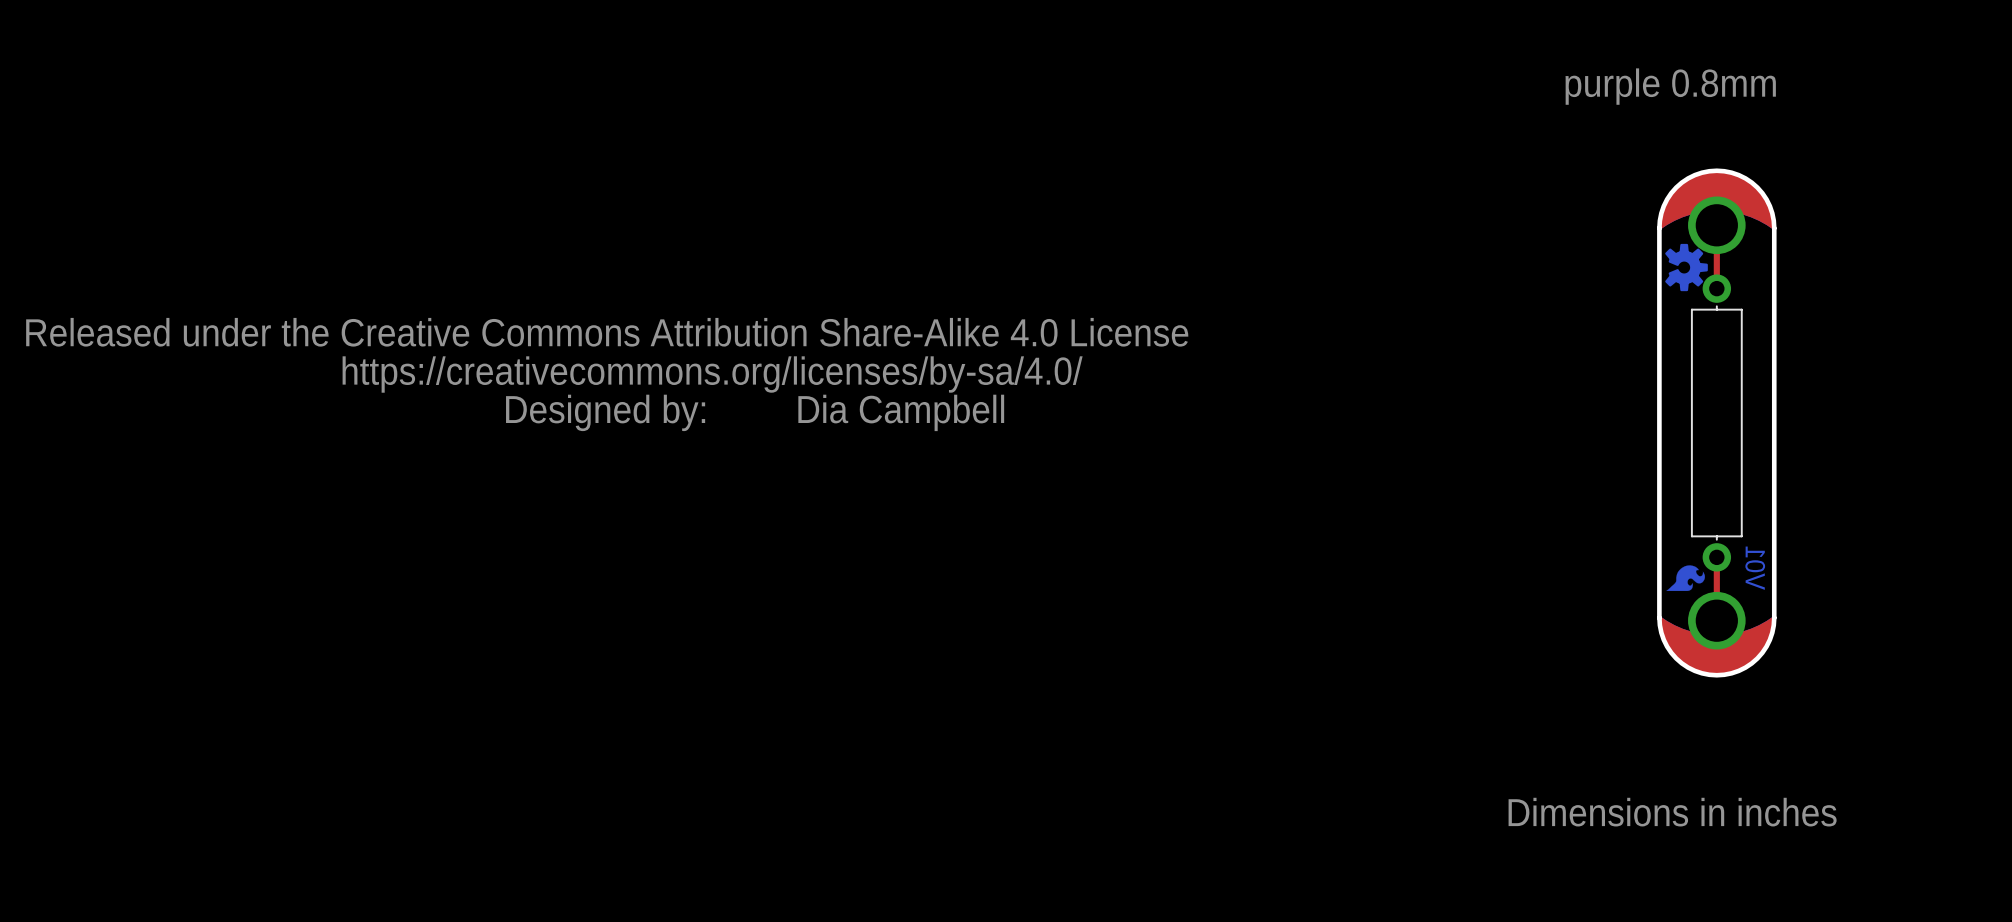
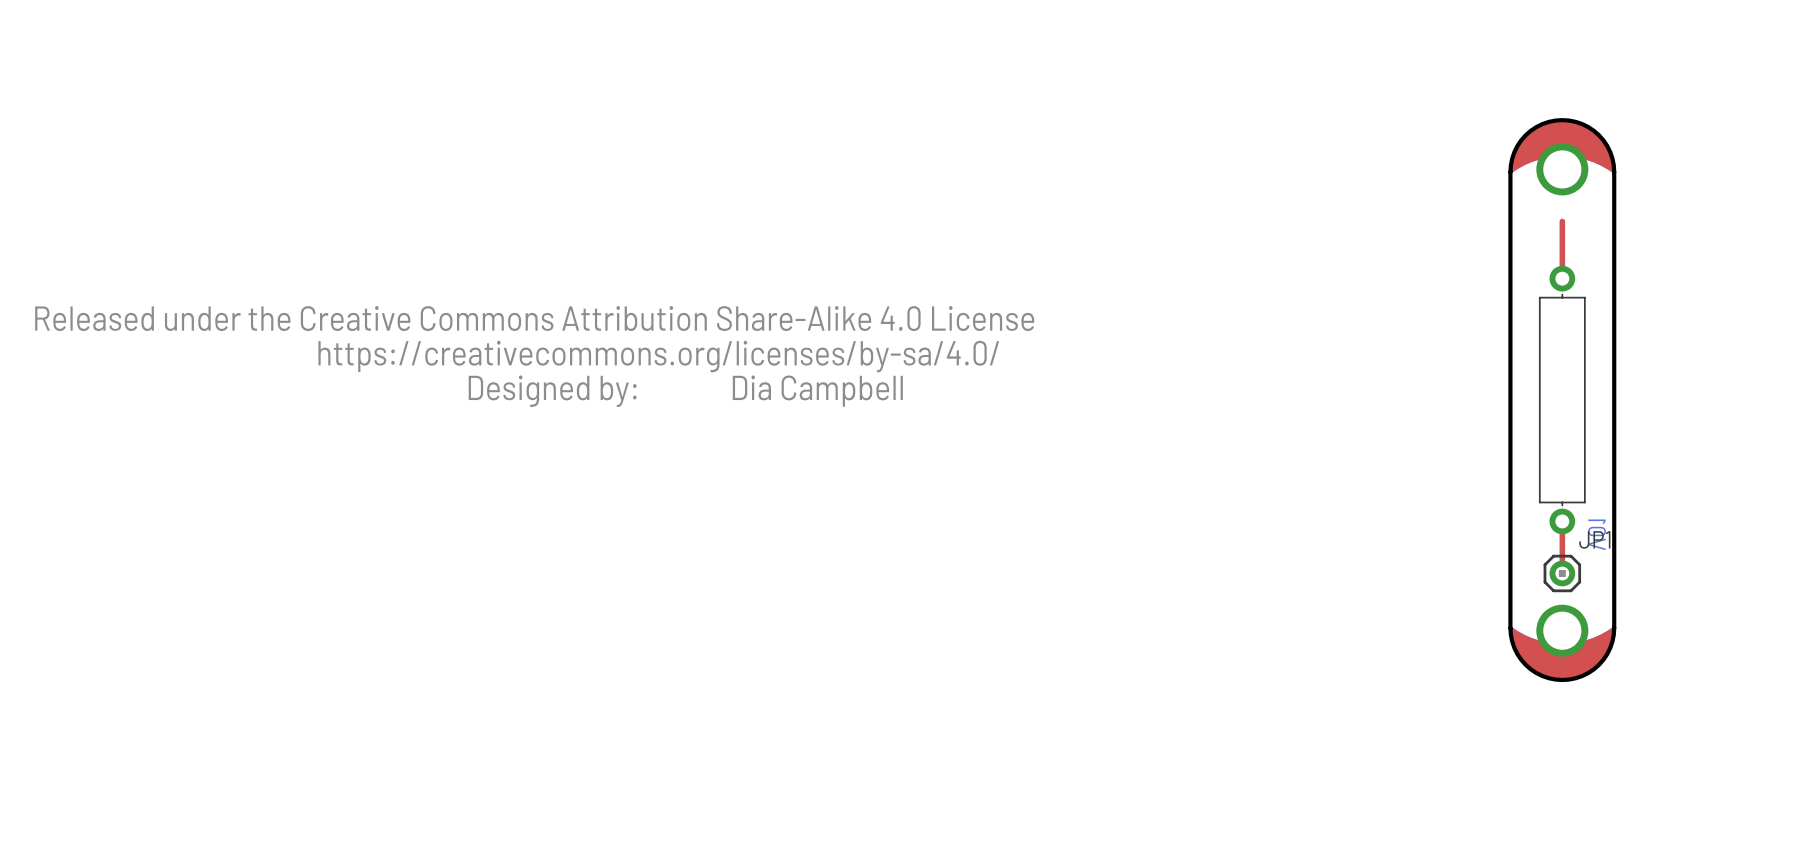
text: purple 0.8mm (1670, 86) -> none
part position: (1716, 212) -> (1562, 157)
board edge: (1659, 228) (1663, 206) (1676, 187) (1694, 175) (1716, 170) (1738, 175) (1757, 187) (1769, 206) (1774, 228) -> (1510, 224) (1510, 165) (1517, 146) (1525, 135) (1536, 127) (1548, 121) (1562, 120) (1575, 121) (1588, 127) (1599, 135) (1607, 146) (1613, 165) (1614, 224)
drawing: [1665, 243, 1708, 292] -> none
drawing: [1666, 565, 1705, 591] -> none
JP1: none -> (1562, 573)
board edge: (1659, 617) (1663, 639) (1676, 658) (1694, 670) (1716, 675) (1738, 670) (1757, 658) (1769, 639) (1774, 617) -> (1510, 576) (1510, 634) (1517, 654) (1525, 664) (1536, 673) (1548, 678) (1562, 680) (1575, 678) (1588, 673) (1599, 664) (1607, 654) (1613, 634) (1614, 576)
part position: (1716, 633) -> (1562, 642)
text: Dimensions in inches (1672, 812) -> none

